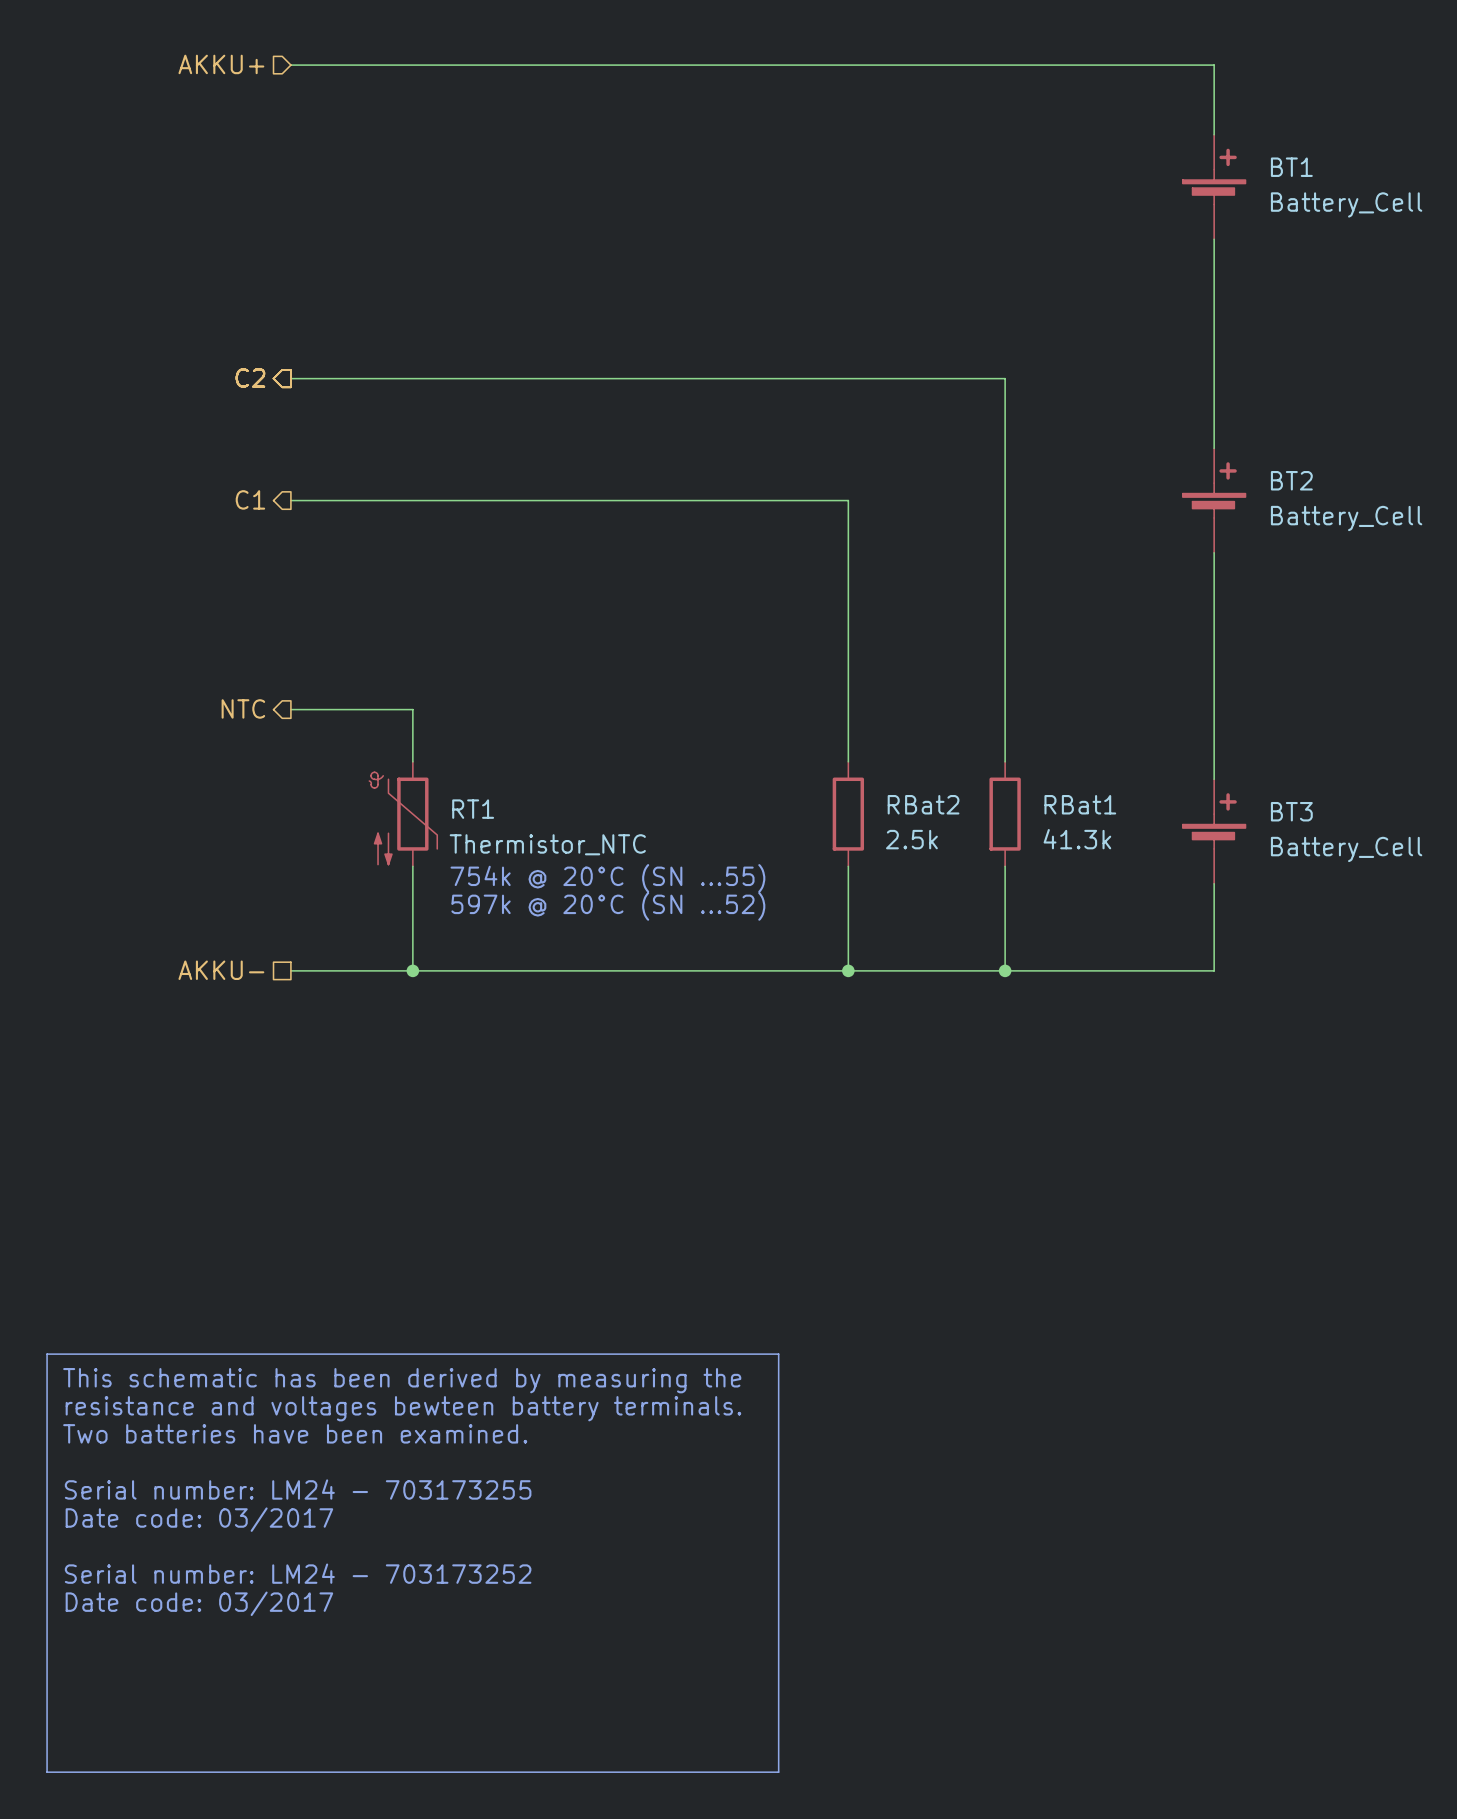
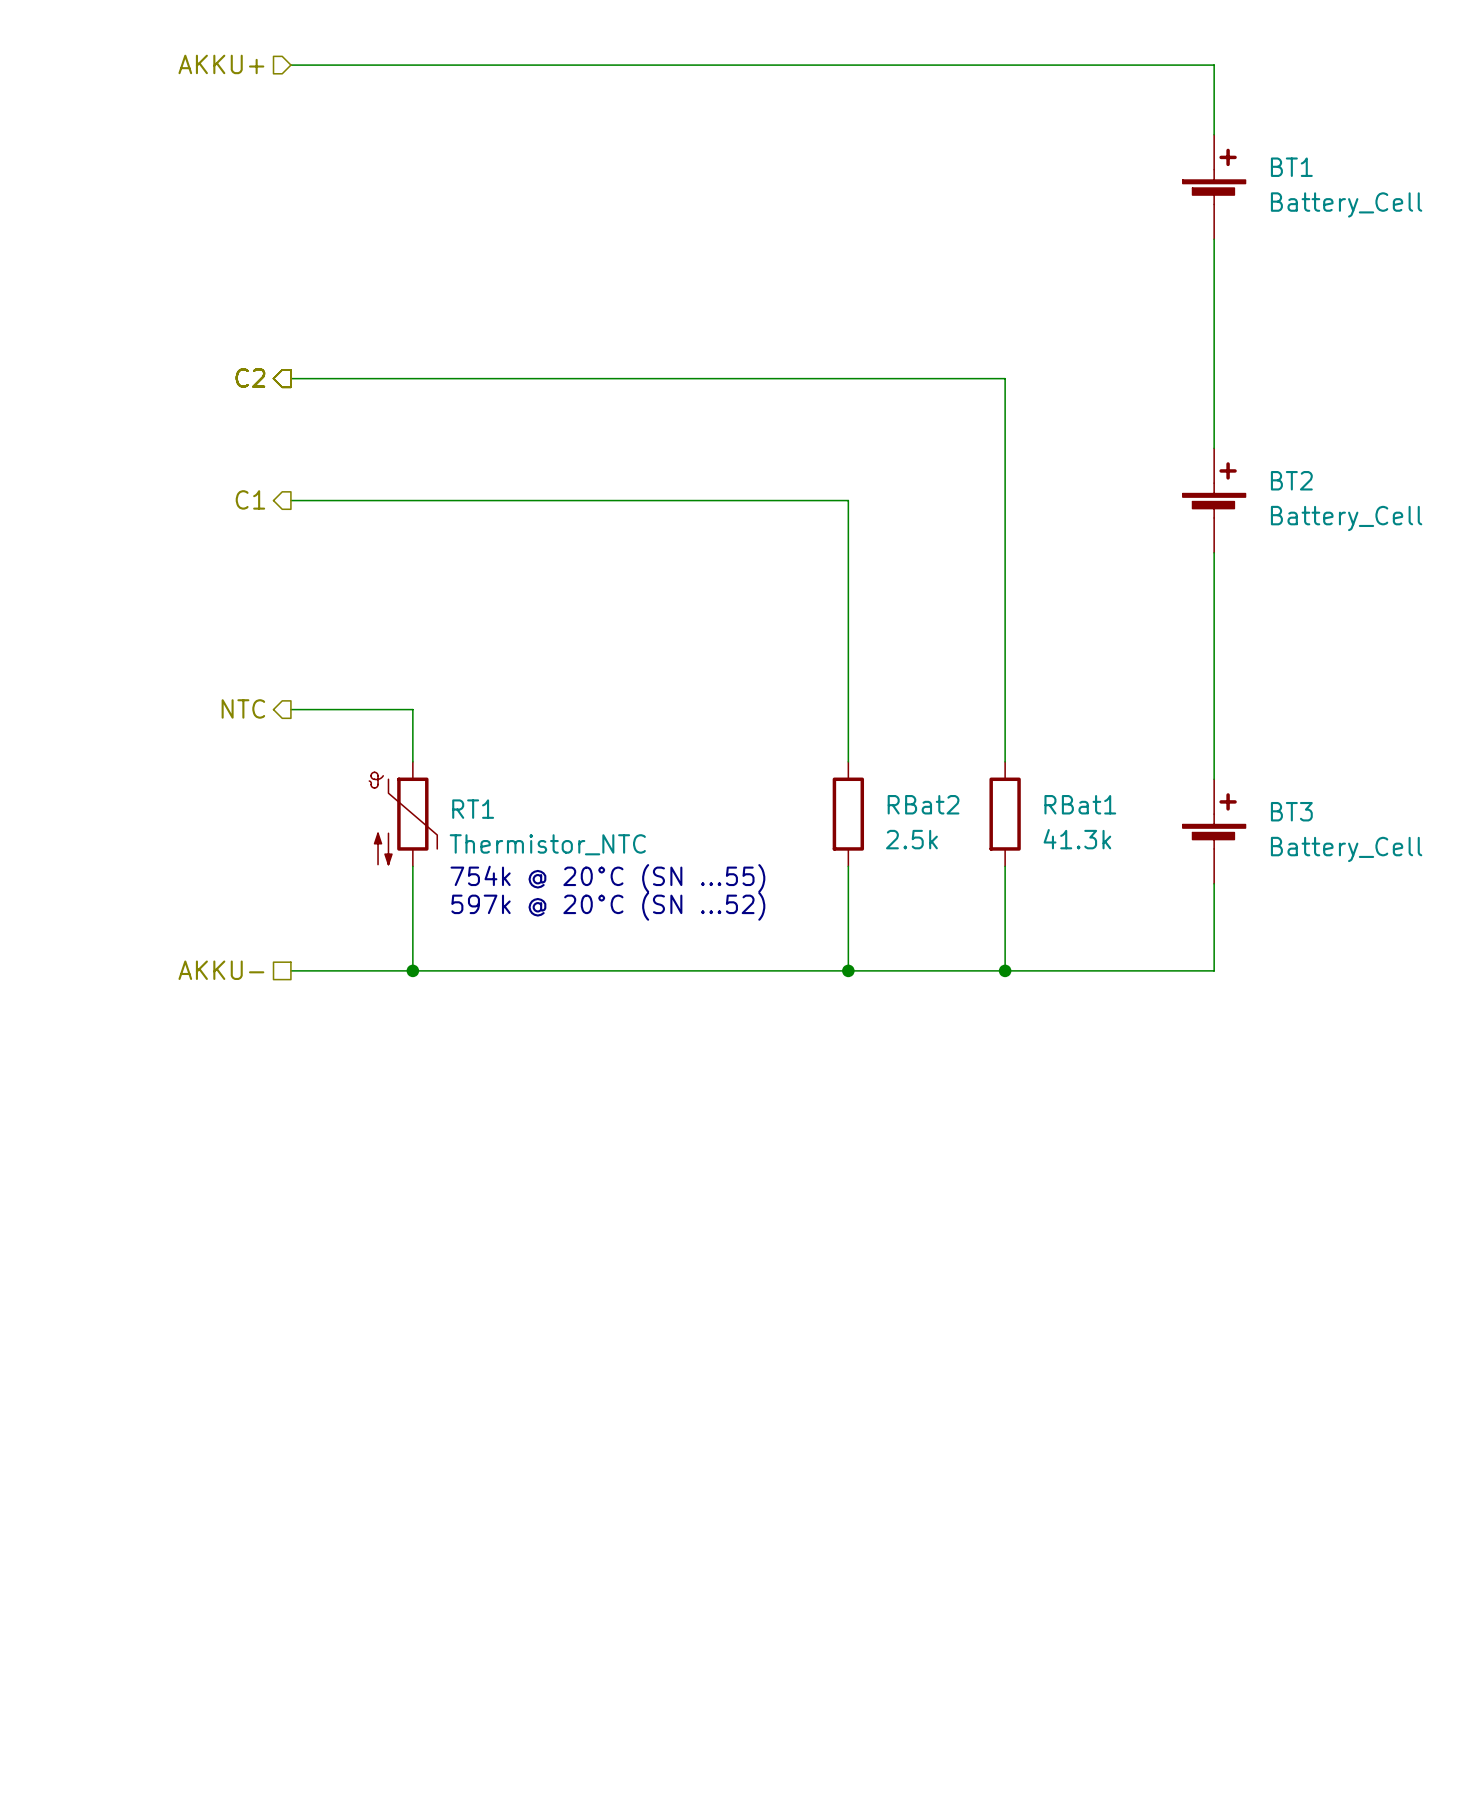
line: (47, 1354) (778, 1354) (778, 1772) (47, 1772) (47, 1354) -> none
text: This schematic has been derived by measuring the (402, 1380) -> none
text: resistance and voltages bewteen battery terminals. (403, 1408) -> none
text: Two batteries have been examined. (295, 1433) -> none
text: Serial number: LM24 - 703173255 (298, 1489) -> none
text: Date code: 03/2017 (199, 1519) -> none
text: Serial number: LM24 - 703173252 (298, 1573) -> none
text: Date code: 03/2017 (199, 1603) -> none

